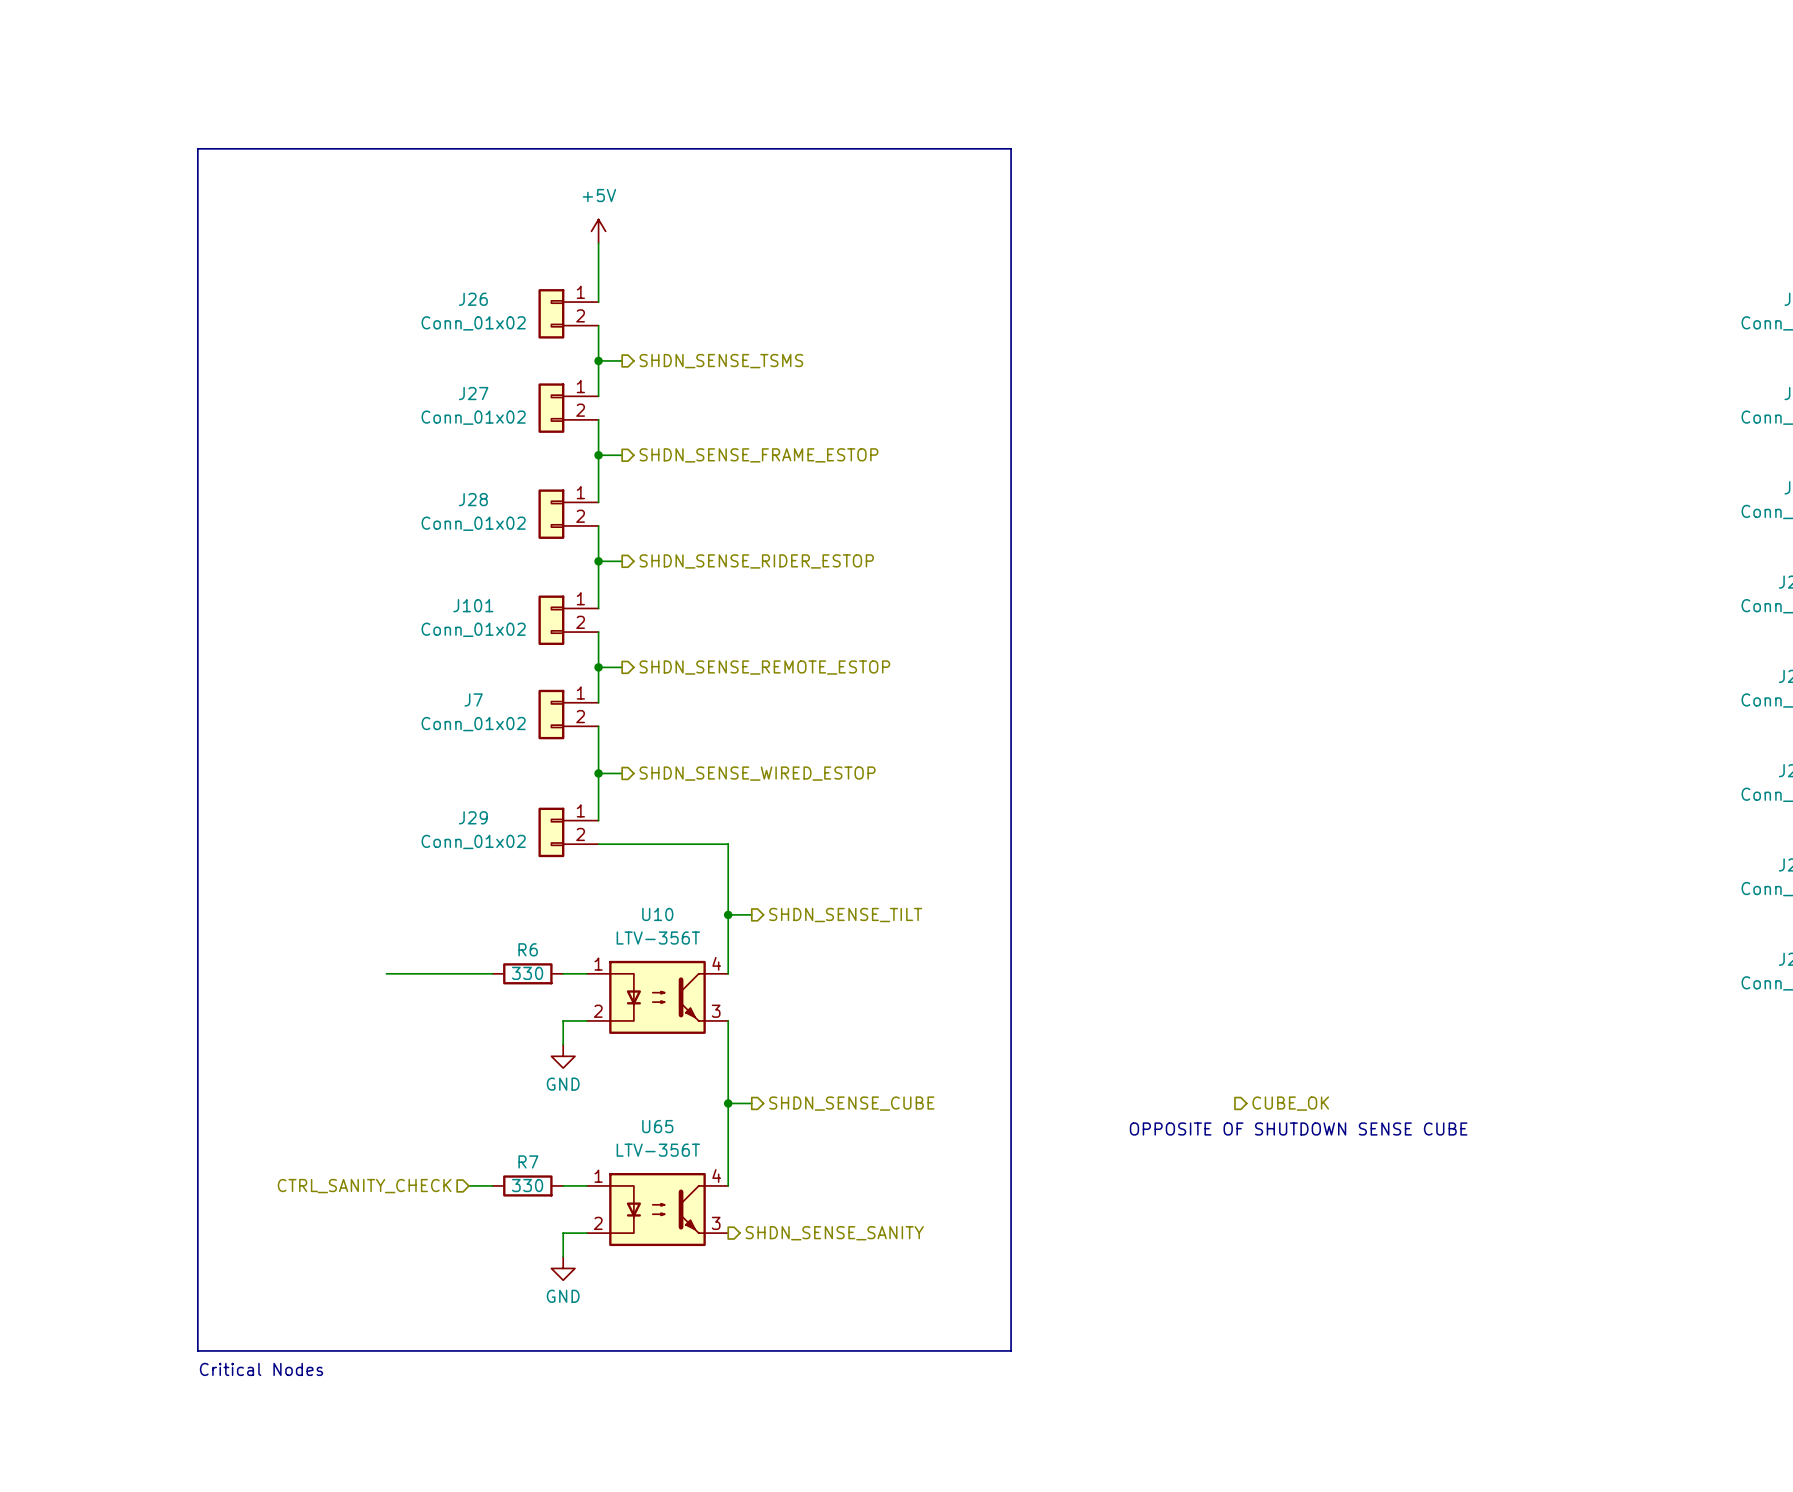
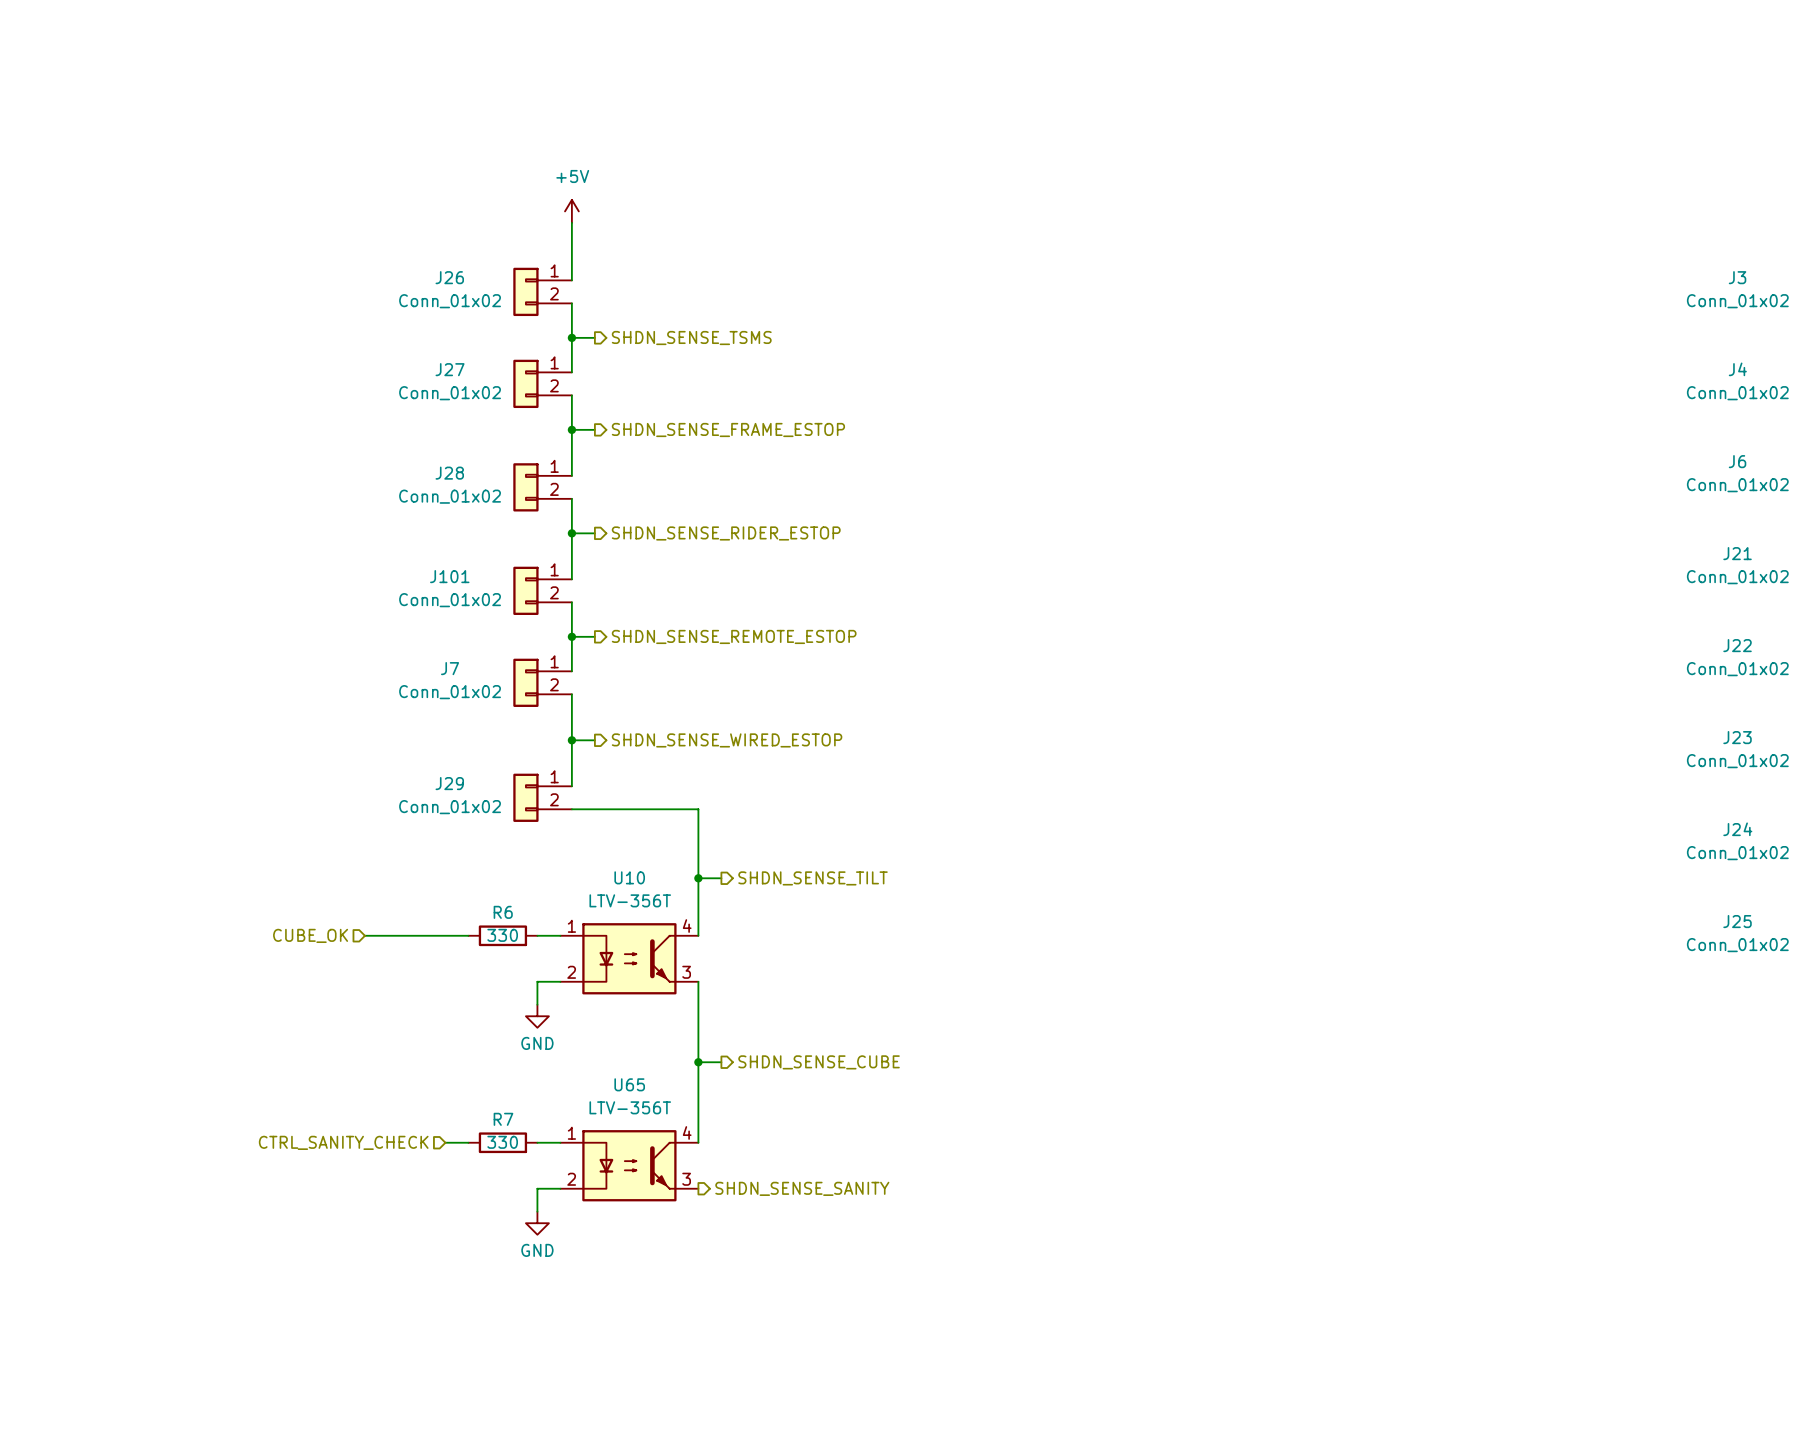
line: (197, 148) (1011, 148) (1011, 1350) (197, 1350) (197, 148) -> none
hierarchical label: none -> CUBE_OK (310, 935)
hierarchical label: CUBE_OK (1290, 1103) -> none
text: OPPOSITE OF SHUTDOWN SENSE CUBE (1298, 1128) -> none
text: Critical Nodes (261, 1369) -> none

